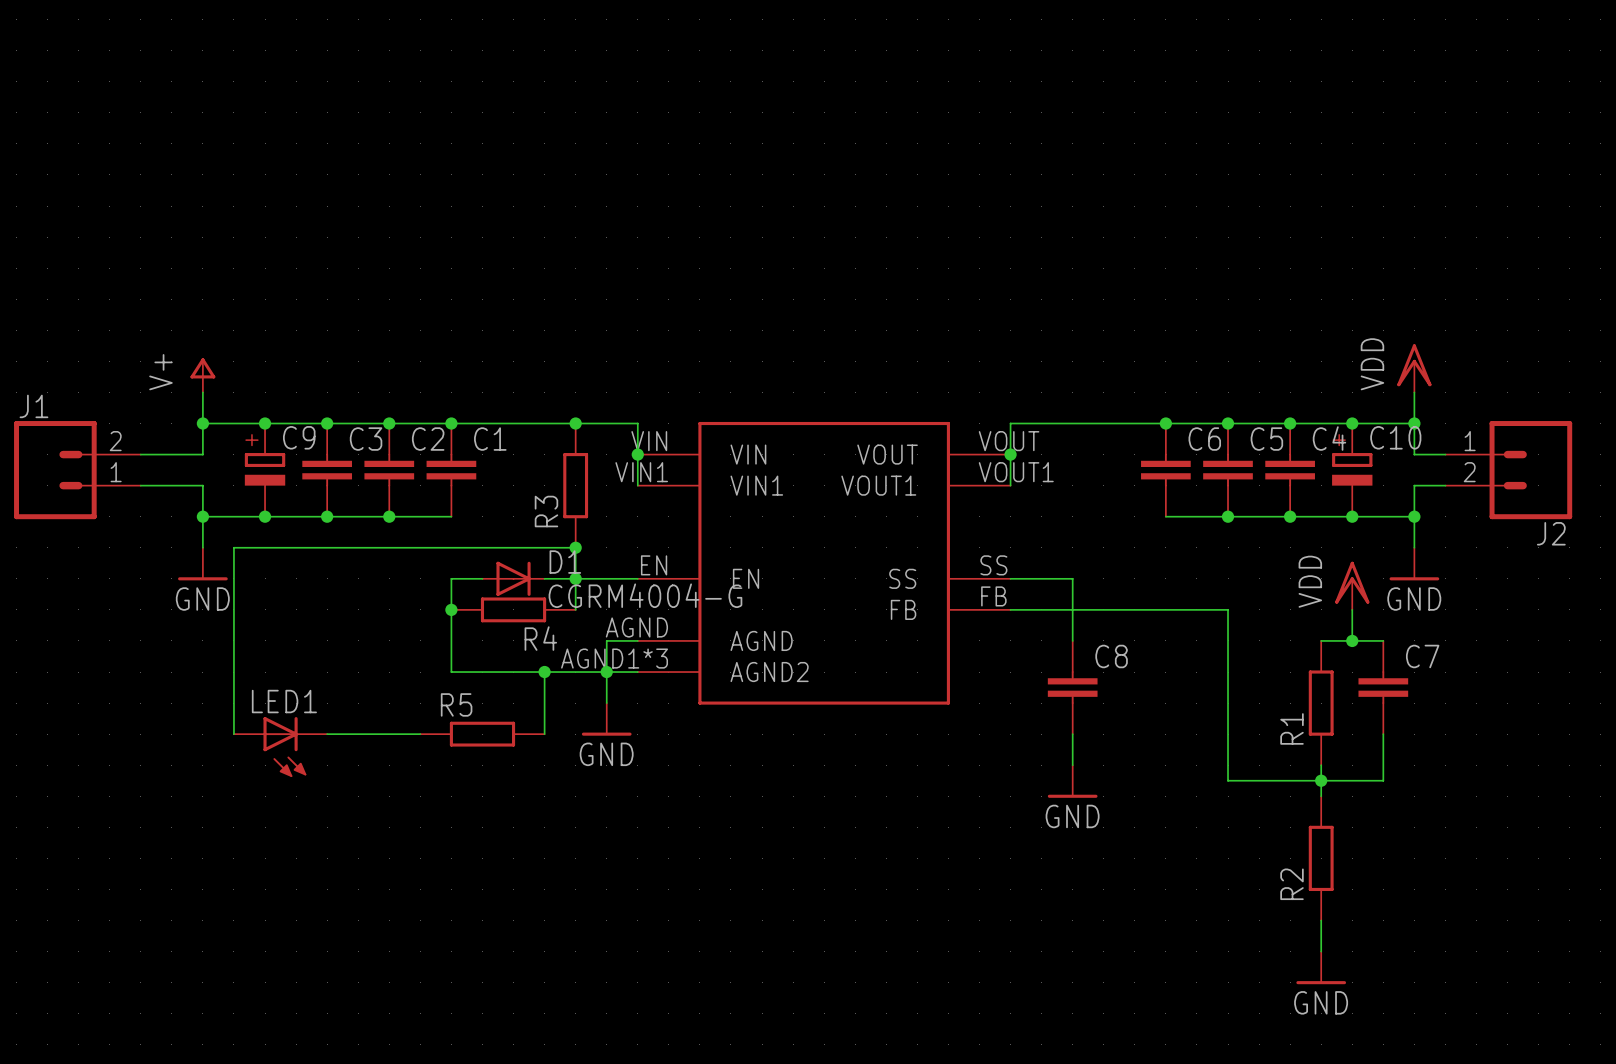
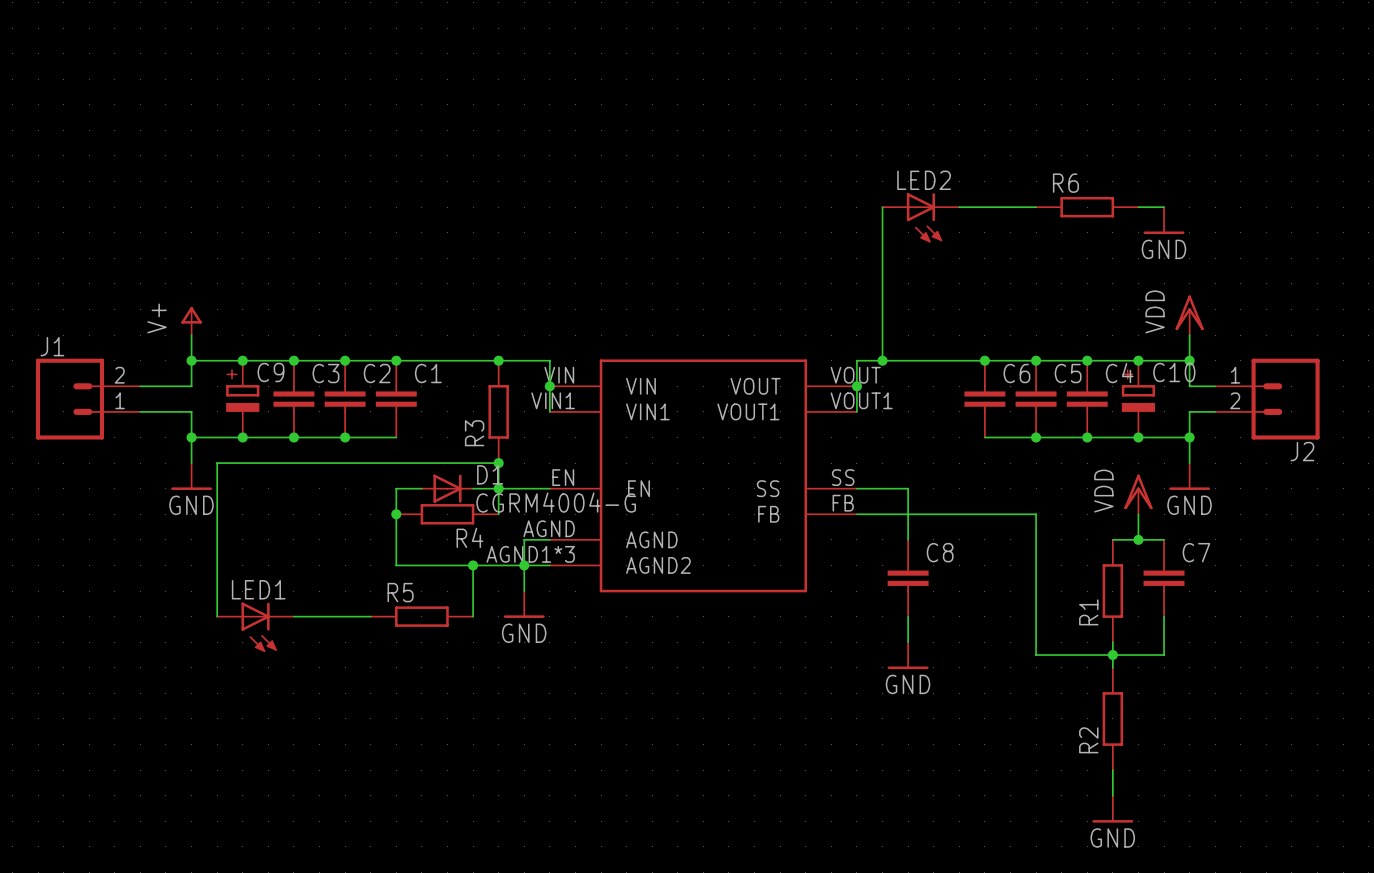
wire: none -> (882, 207) (882, 360)
wire: none -> (959, 207) (1036, 207)
R6: none -> (1087, 207)
wire: none -> (1138, 207) (1164, 207)
LED2: none -> (920, 217)
power symbol: none -> GND (1164, 220)
junction: none -> (882, 360)

